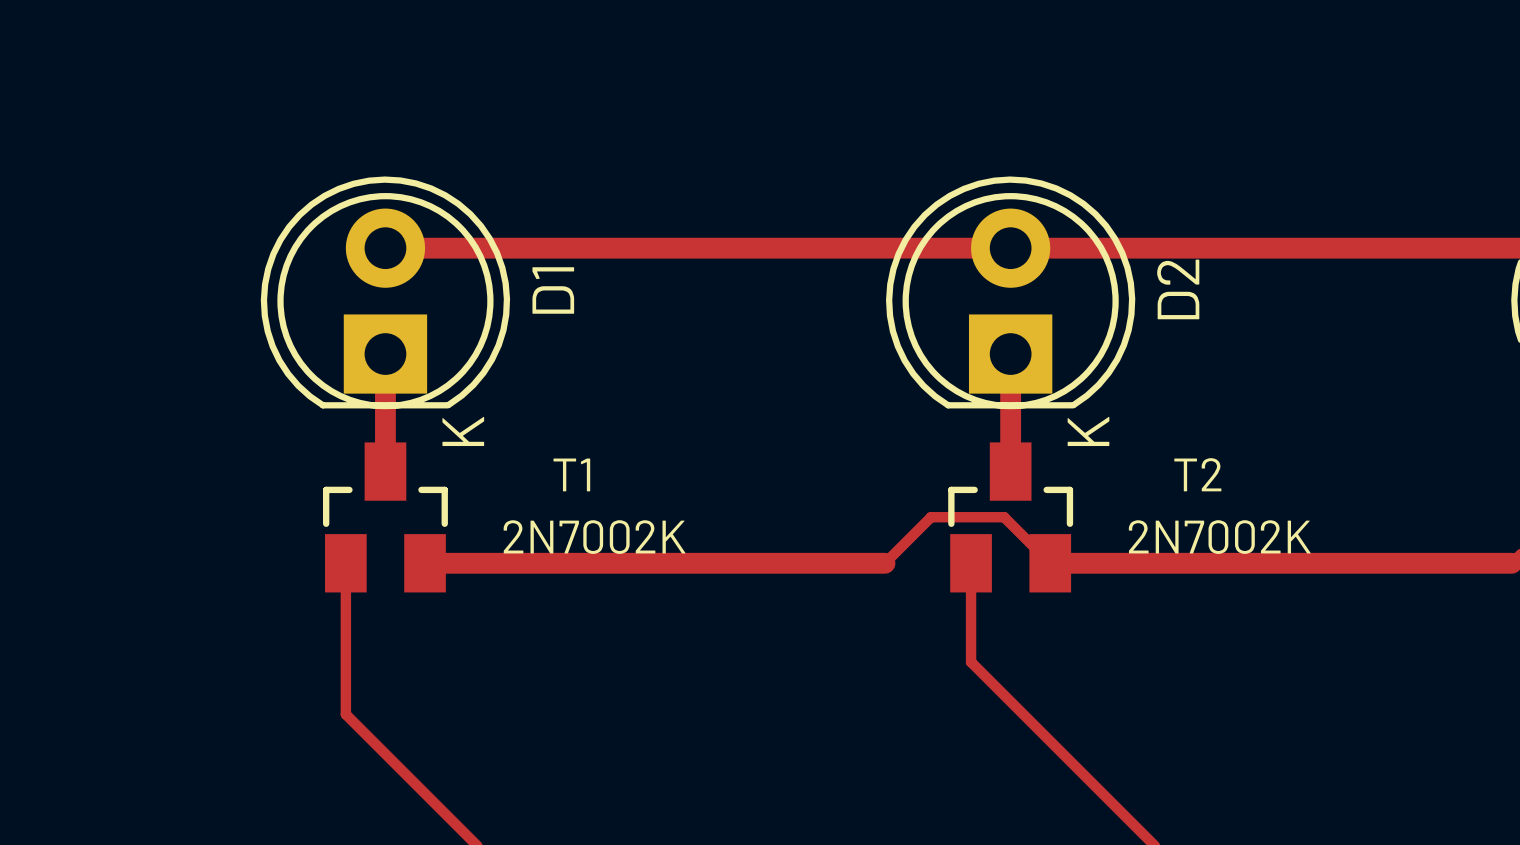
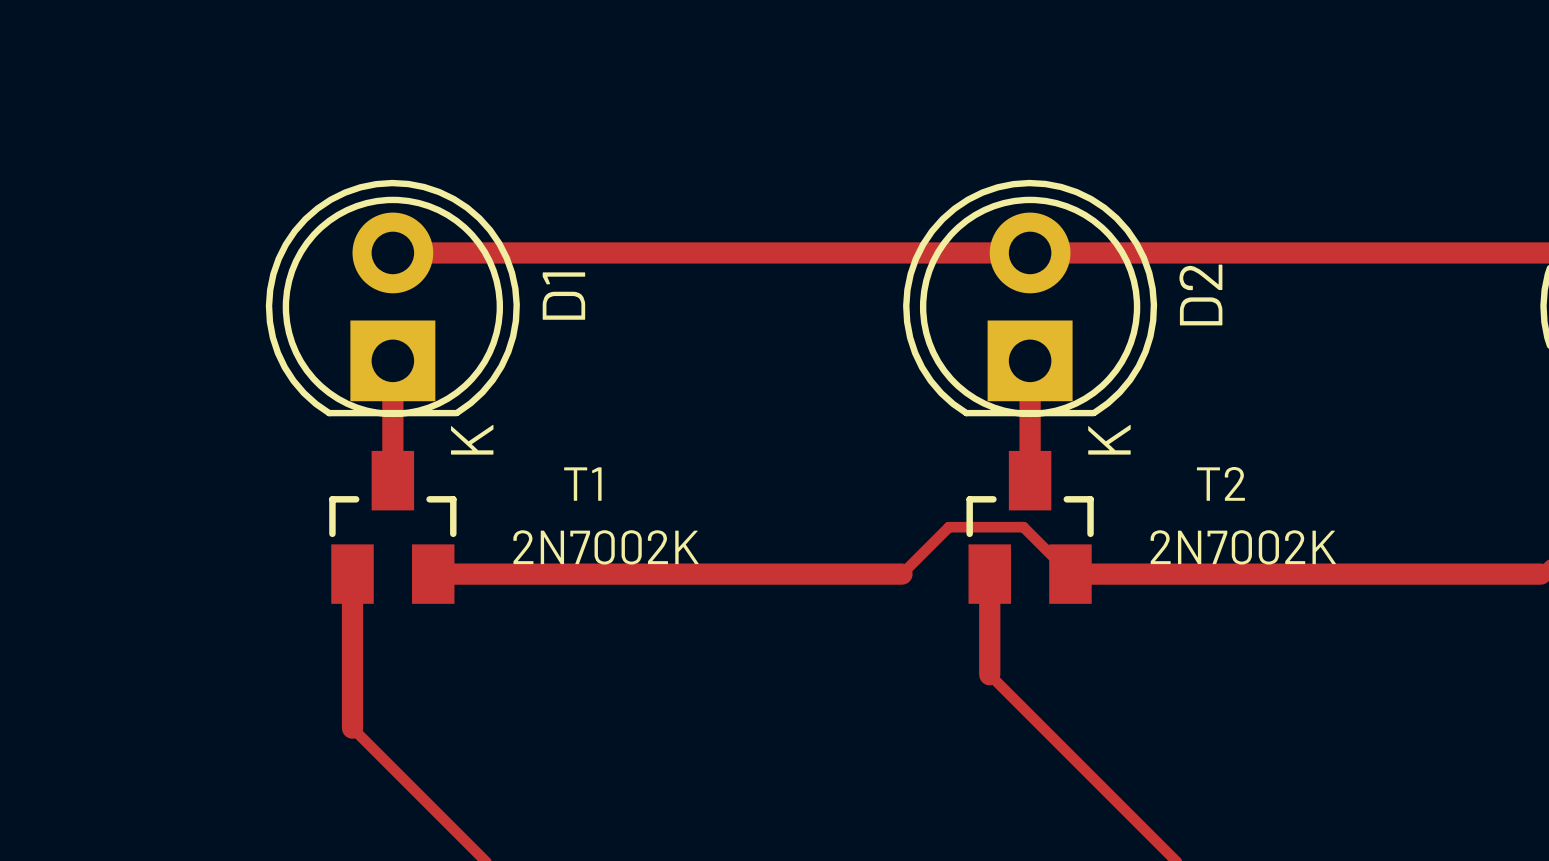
top track width: thin (345, 563) (345, 714) -> thick (352, 574) (352, 728)
top track width: thin (971, 563) (971, 662) -> thick (989, 574) (989, 674)

